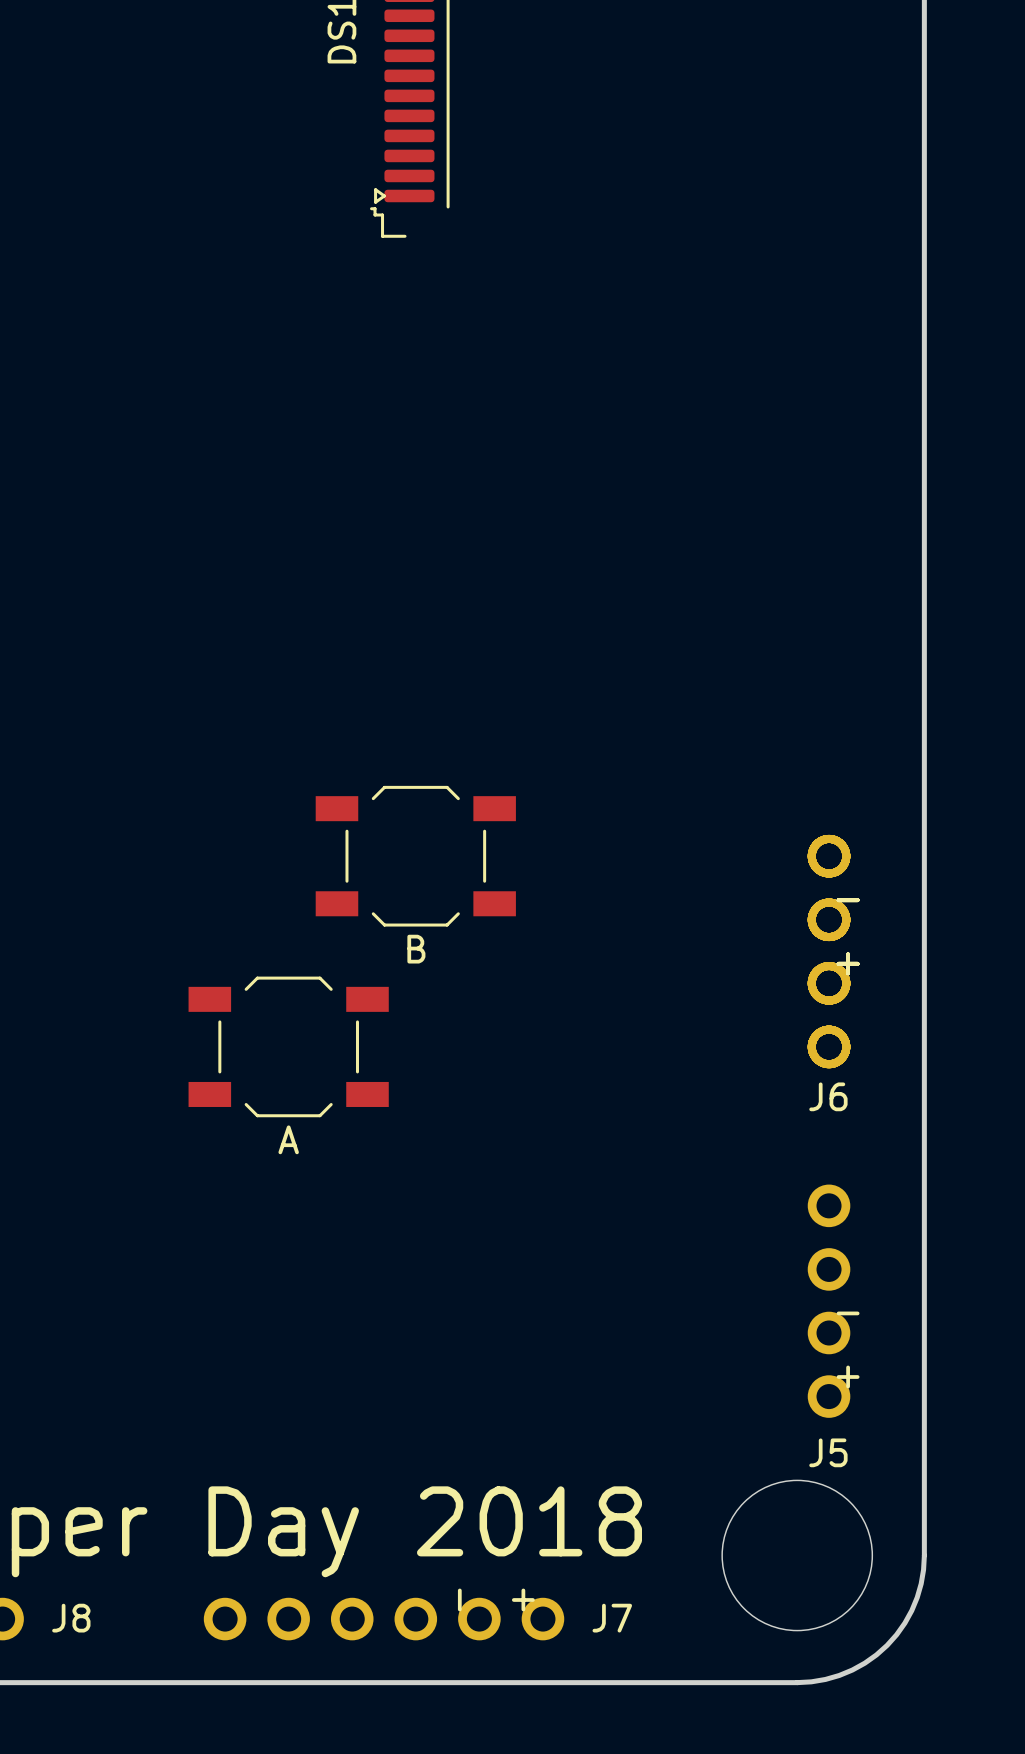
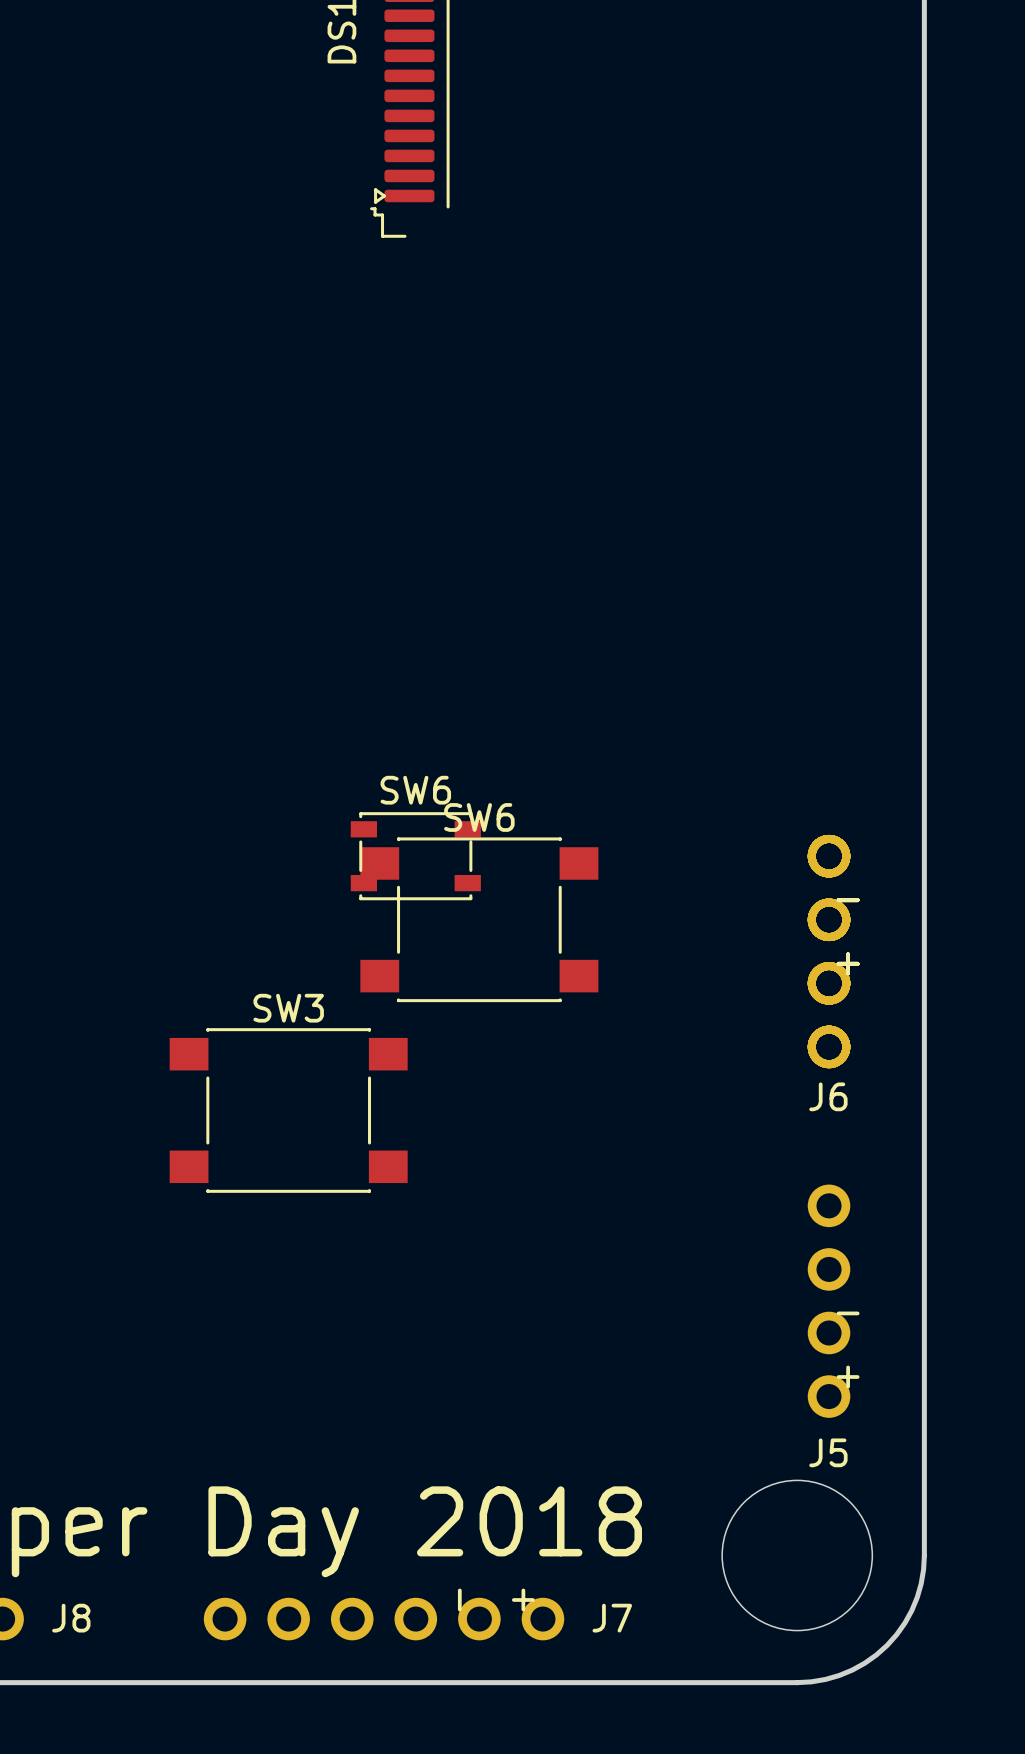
part: B (415, 856) -> none
SW6: none -> (415, 856)
SW6: none -> (479, 919)
part: A (288, 1046) -> none
SW3: none -> (288, 1110)

